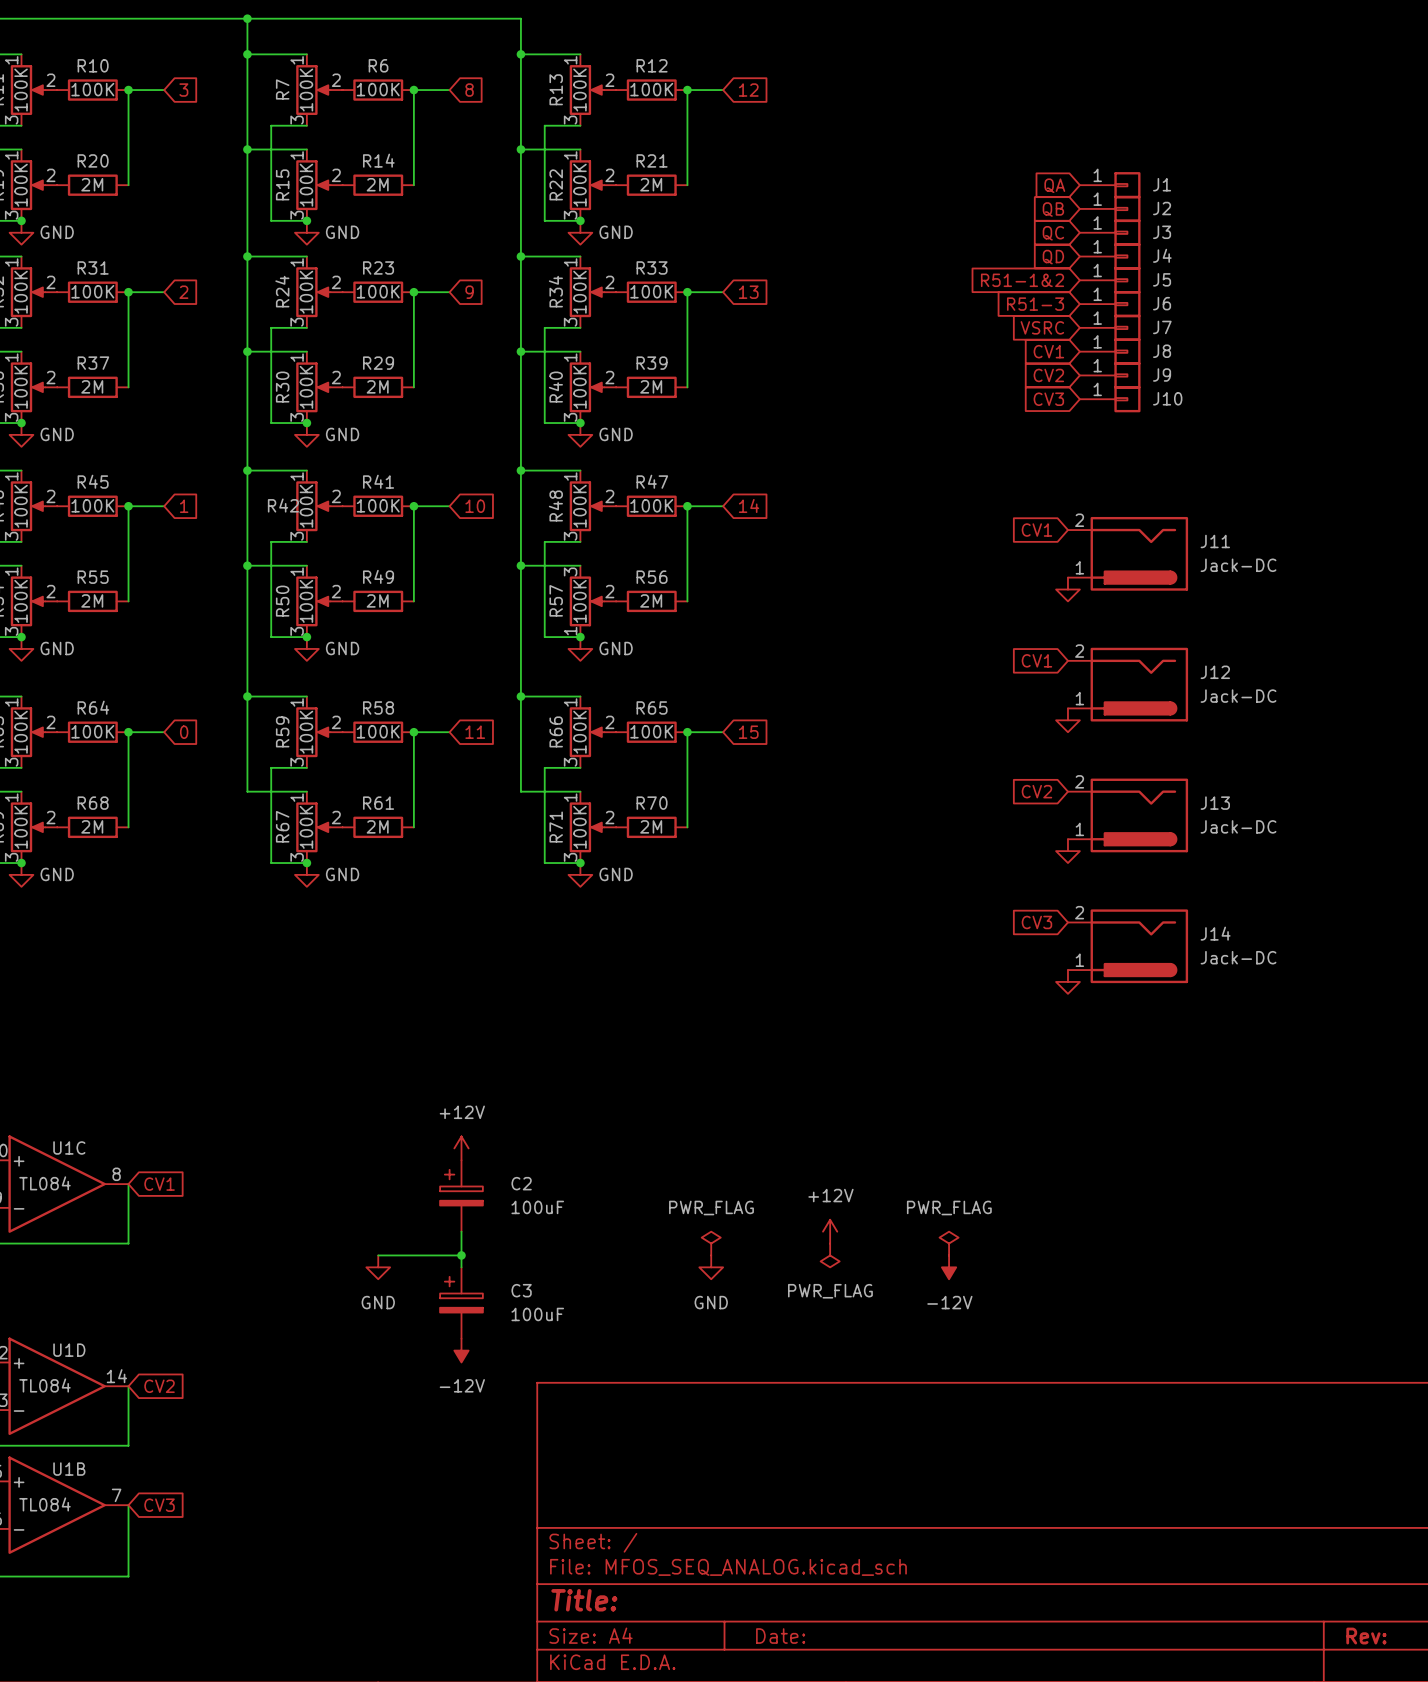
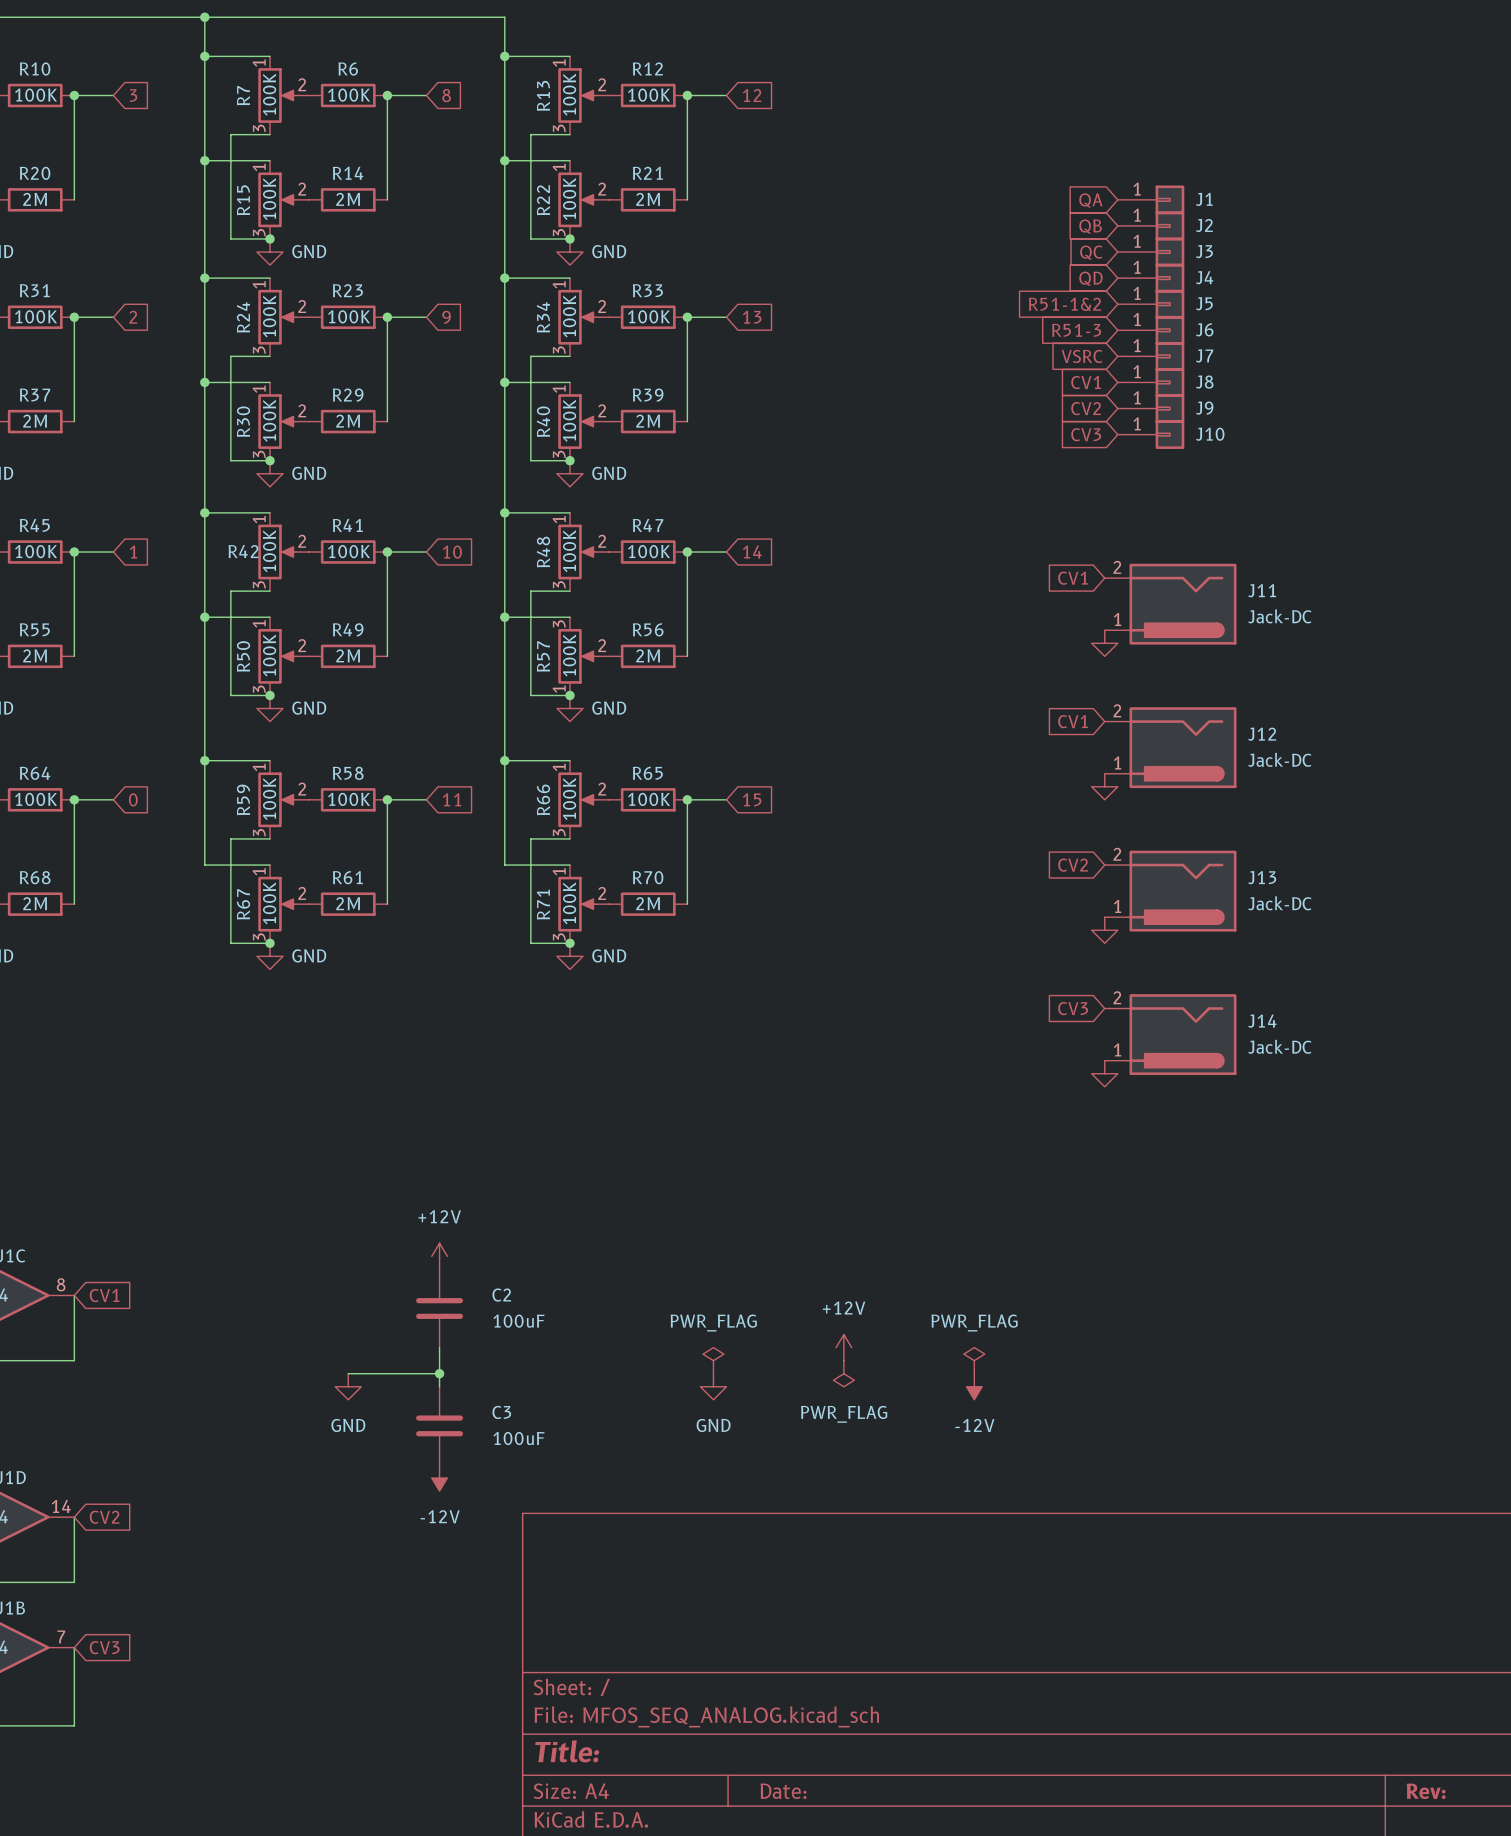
C2 symbol: [440, 1160, 483, 1232] -> [416, 1269, 464, 1348]
C3 symbol: [440, 1267, 483, 1339] -> [416, 1386, 464, 1466]

